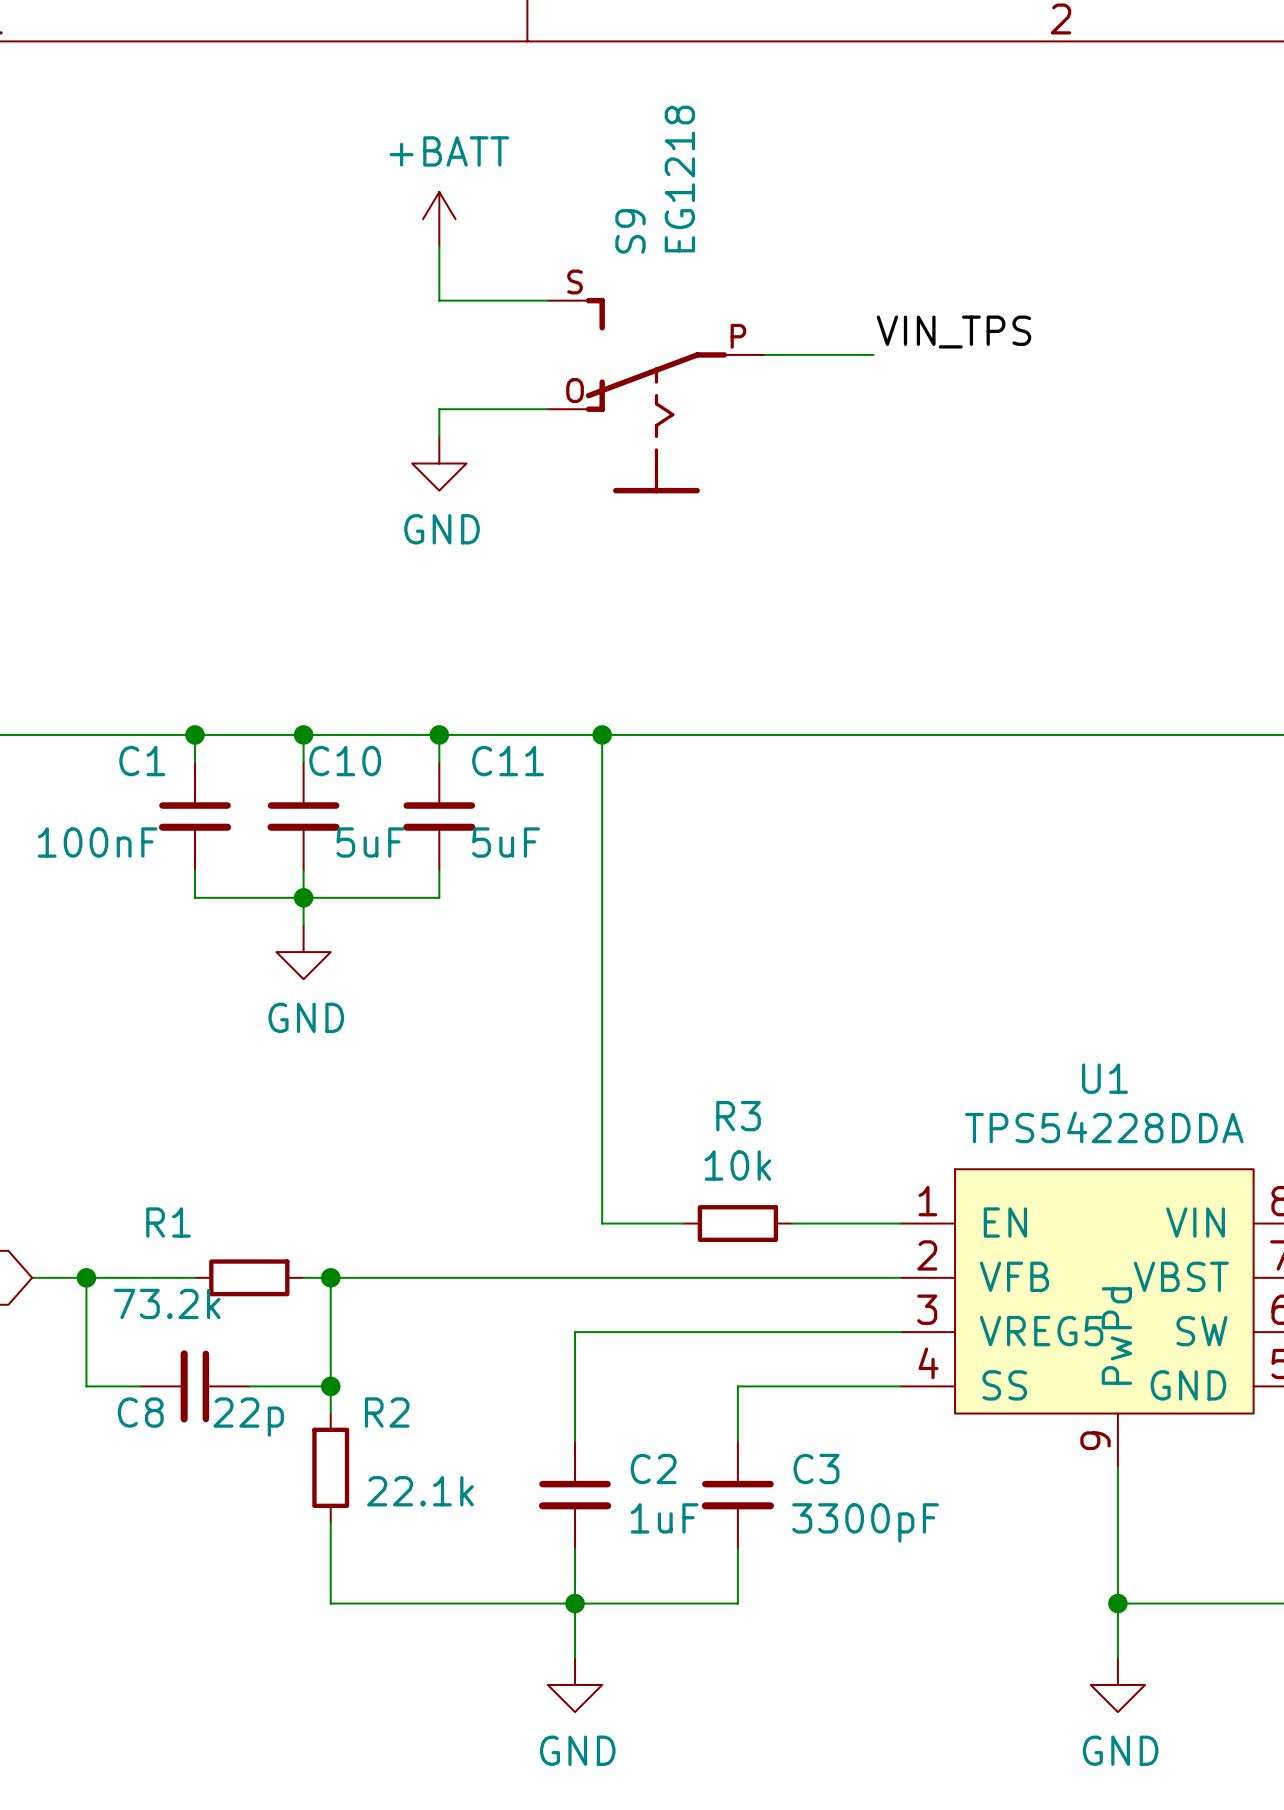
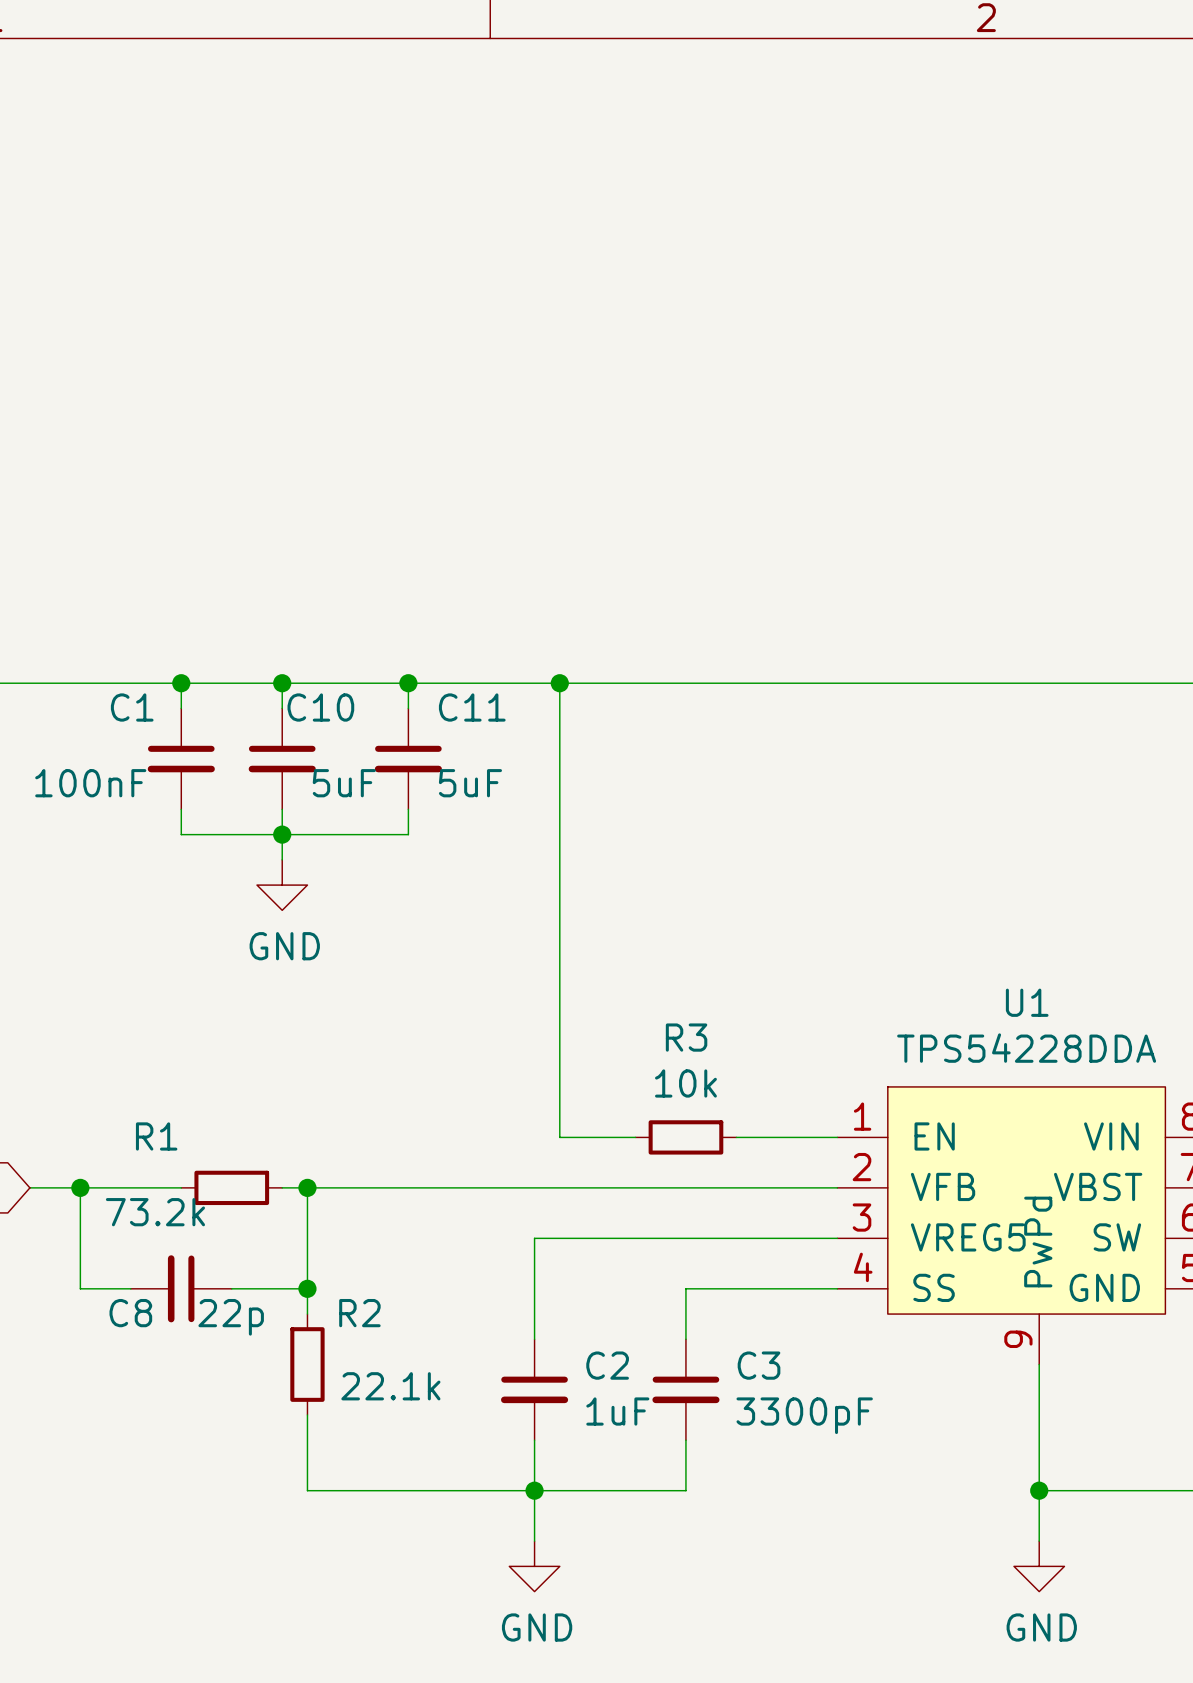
power symbol: +BATT (439, 219) -> none
wire: (439, 246) (439, 300) (547, 300) -> none
label: VIN_TPS (953, 332) -> none
wire: (765, 354) (873, 354) -> none
S9: EG1218 (656, 395) -> none
wire: (547, 409) (439, 409) (439, 436) -> none
power symbol: GND (439, 463) -> none

